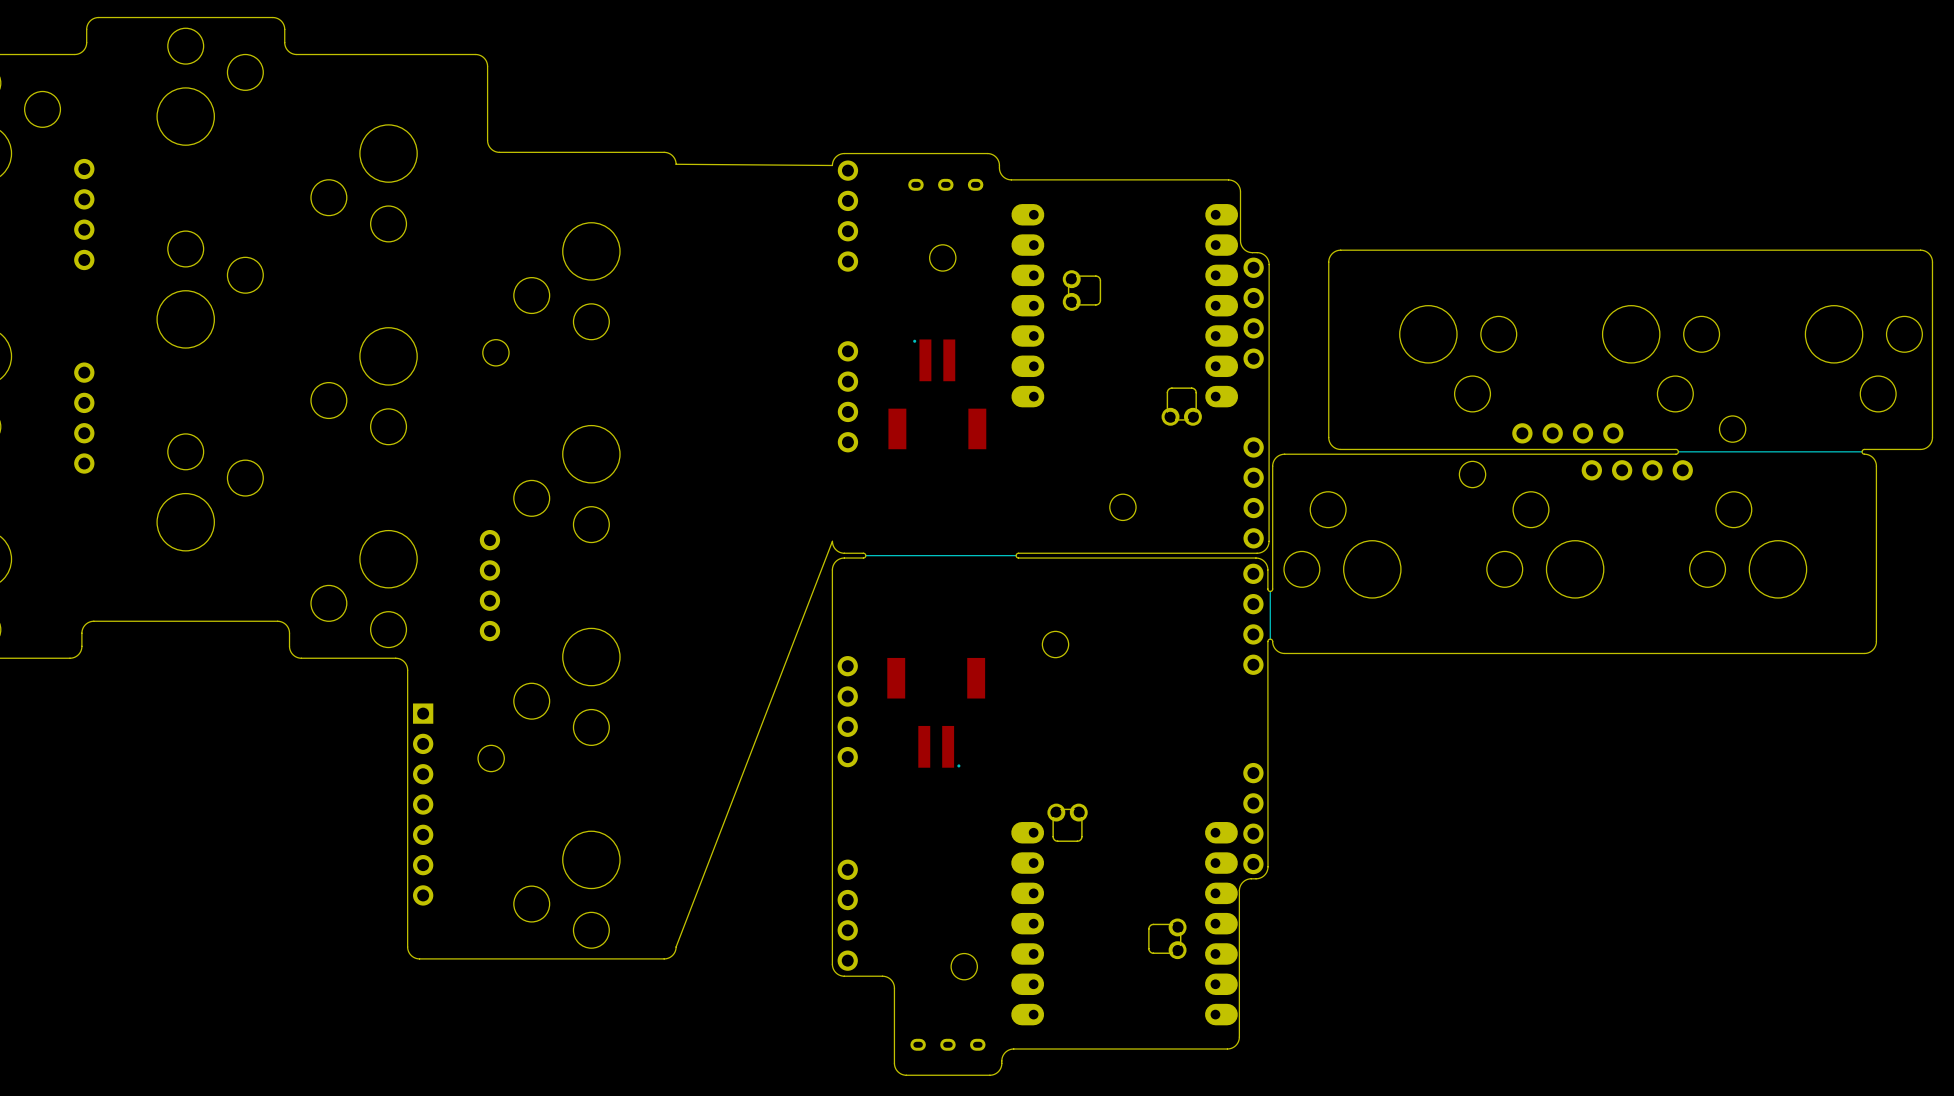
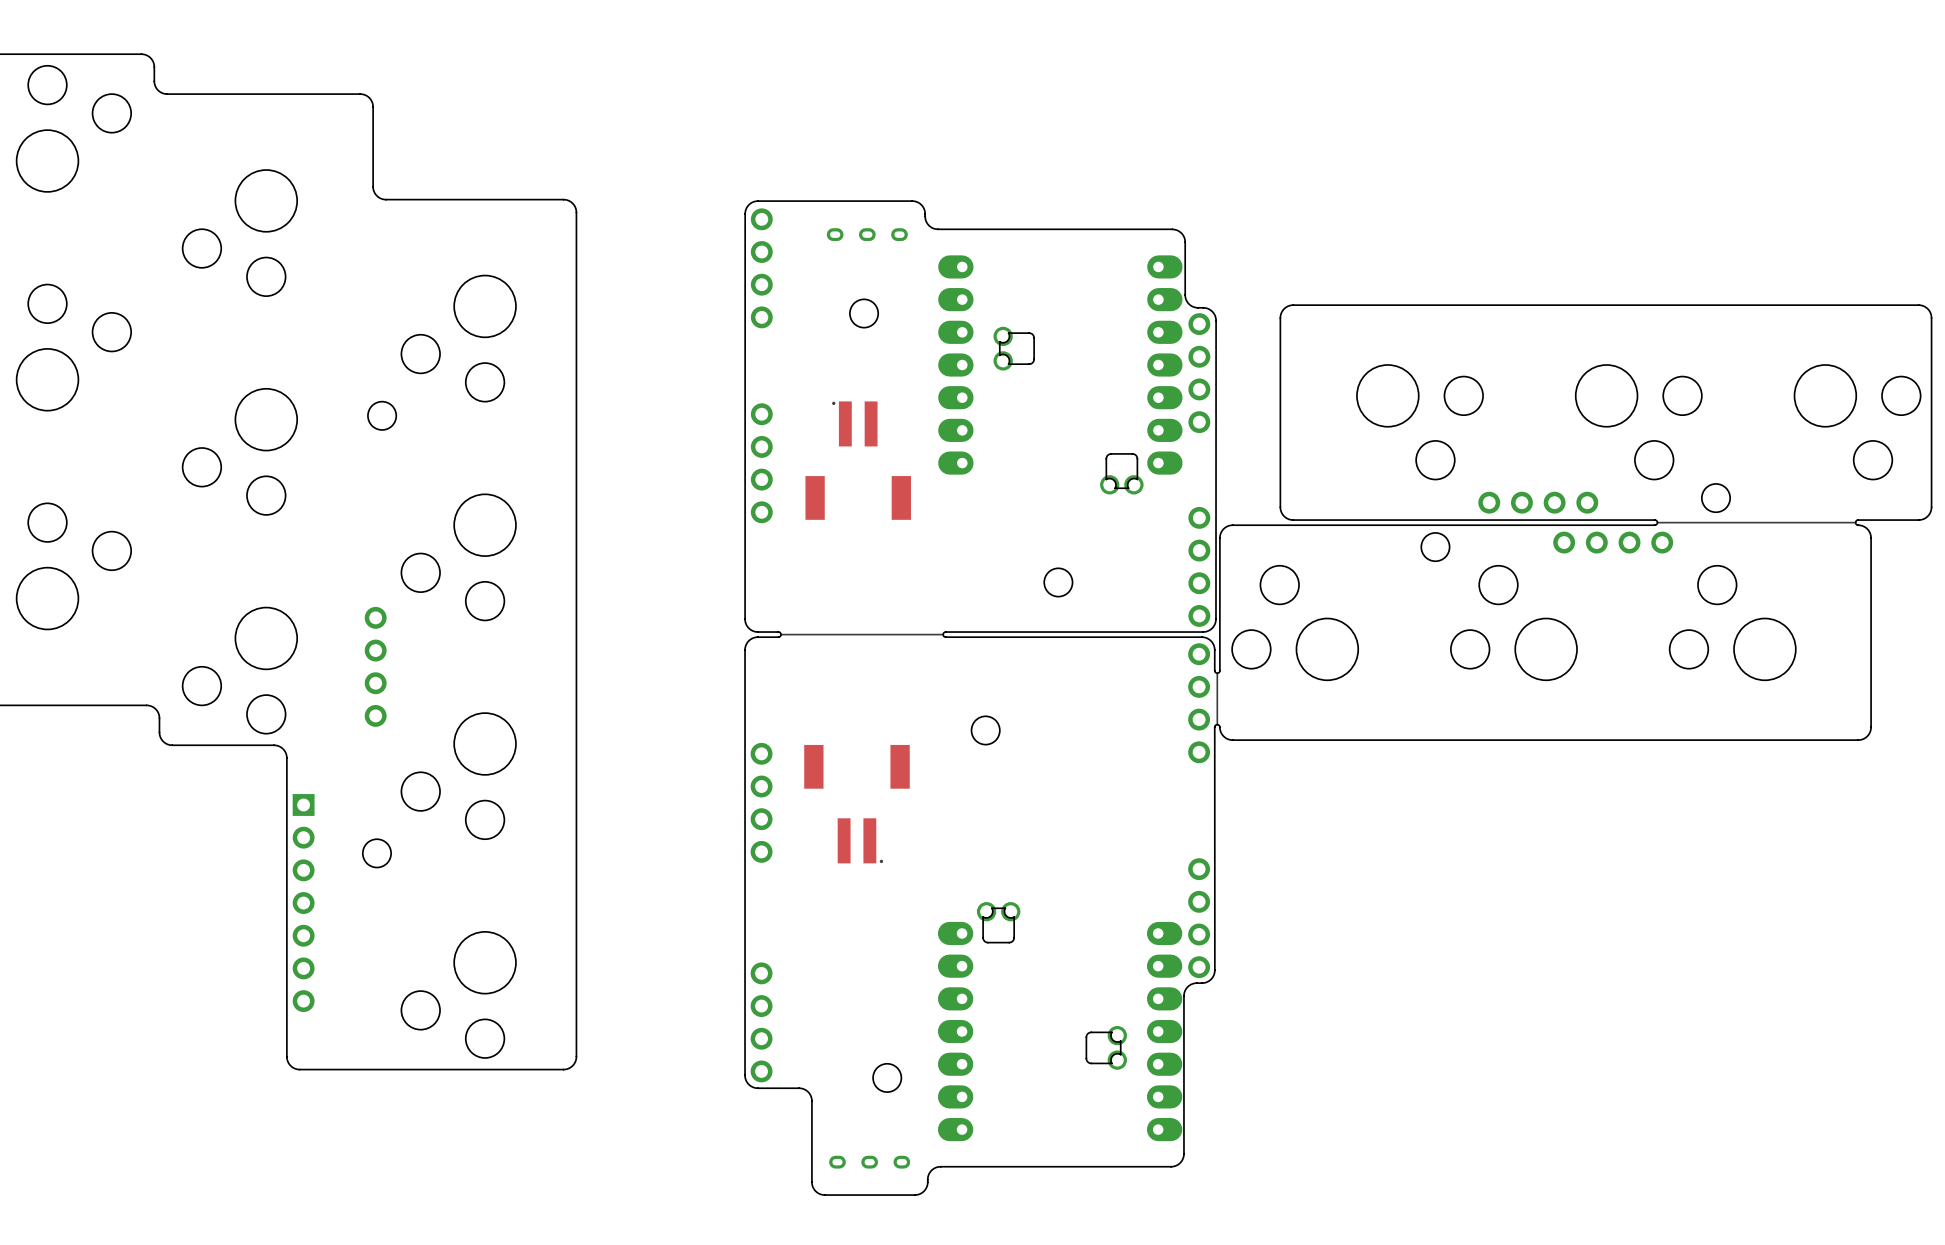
board edge: (676, 164) (832, 165) (835, 157) (842, 153) (987, 153) (995, 157) (999, 165) -> (745, 619) (746, 208) (751, 203) (758, 201) (912, 201) (921, 204) (925, 213)
board edge: (832, 541) (676, 946) -> (576, 212) (576, 1056)

